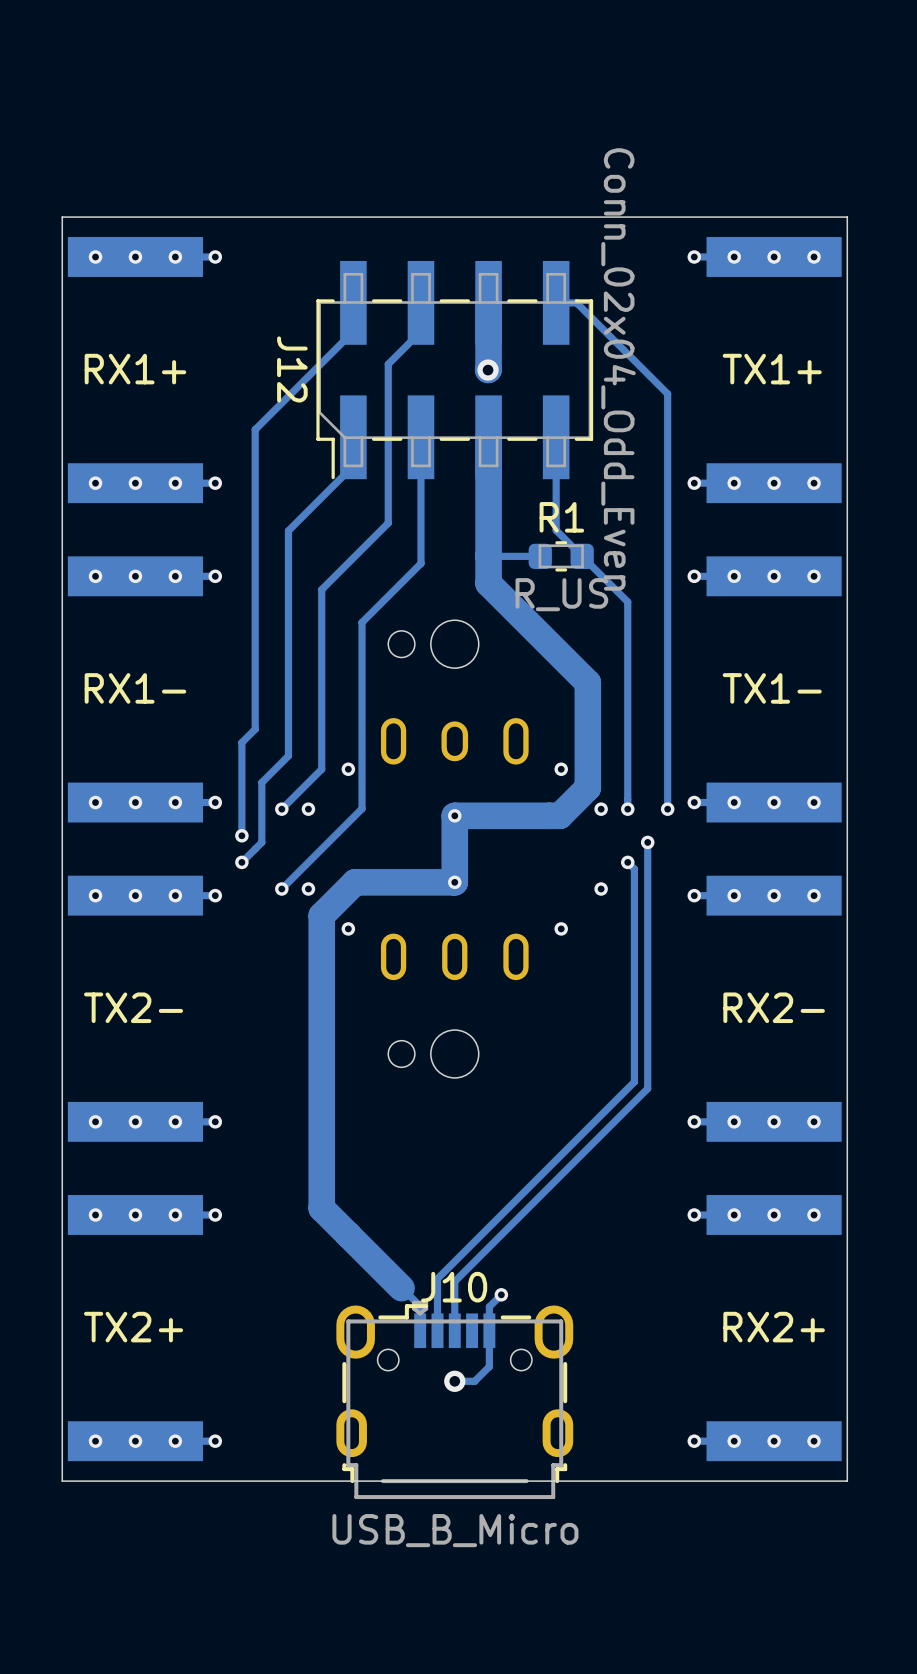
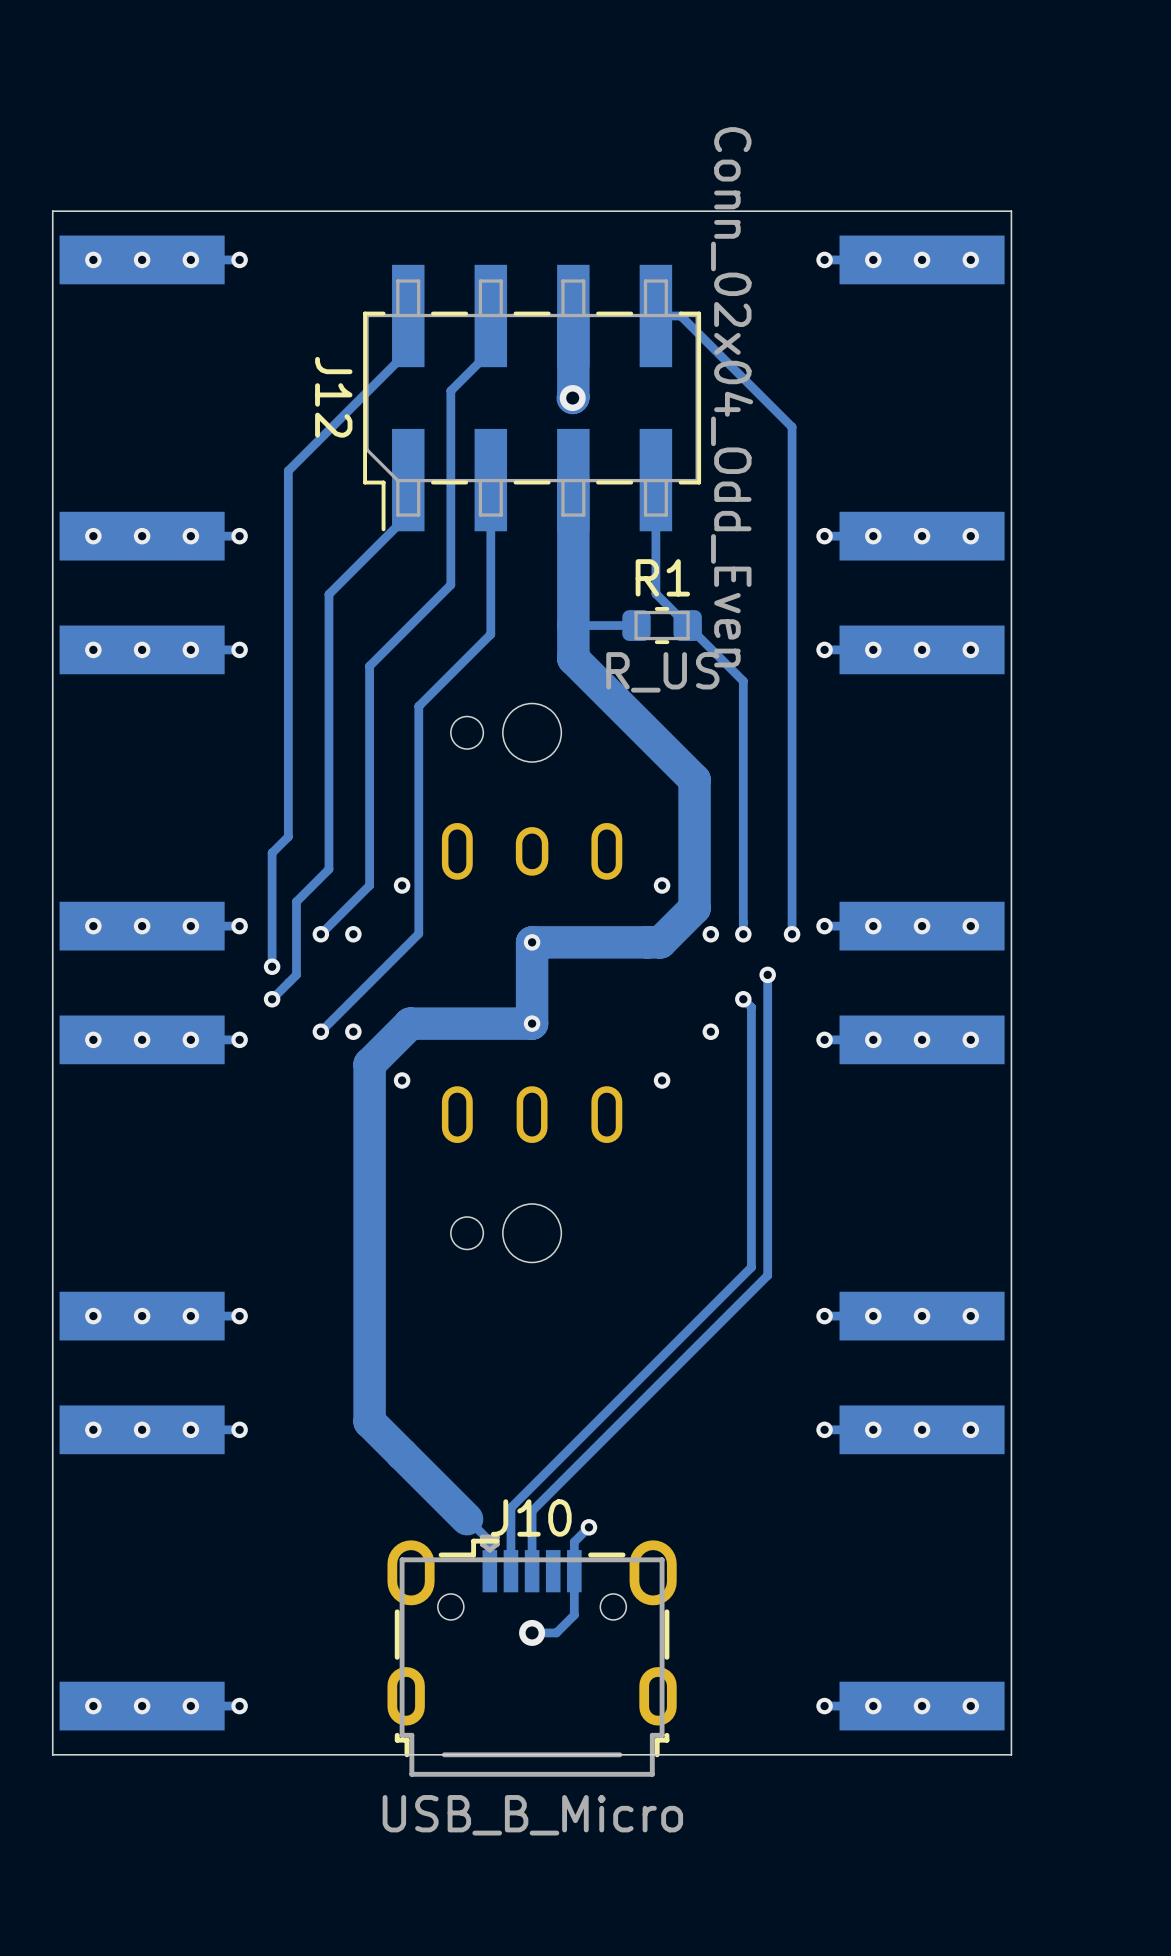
text: RX1+ (135, 369) -> none
text: TX1+ (772, 369) -> none
text: RX1- (135, 688) -> none
text: TX1- (772, 688) -> none
text: TX2- (133, 1007) -> none
text: RX2- (774, 1007) -> none
text: TX2+ (133, 1327) -> none
text: RX2+ (774, 1327) -> none

